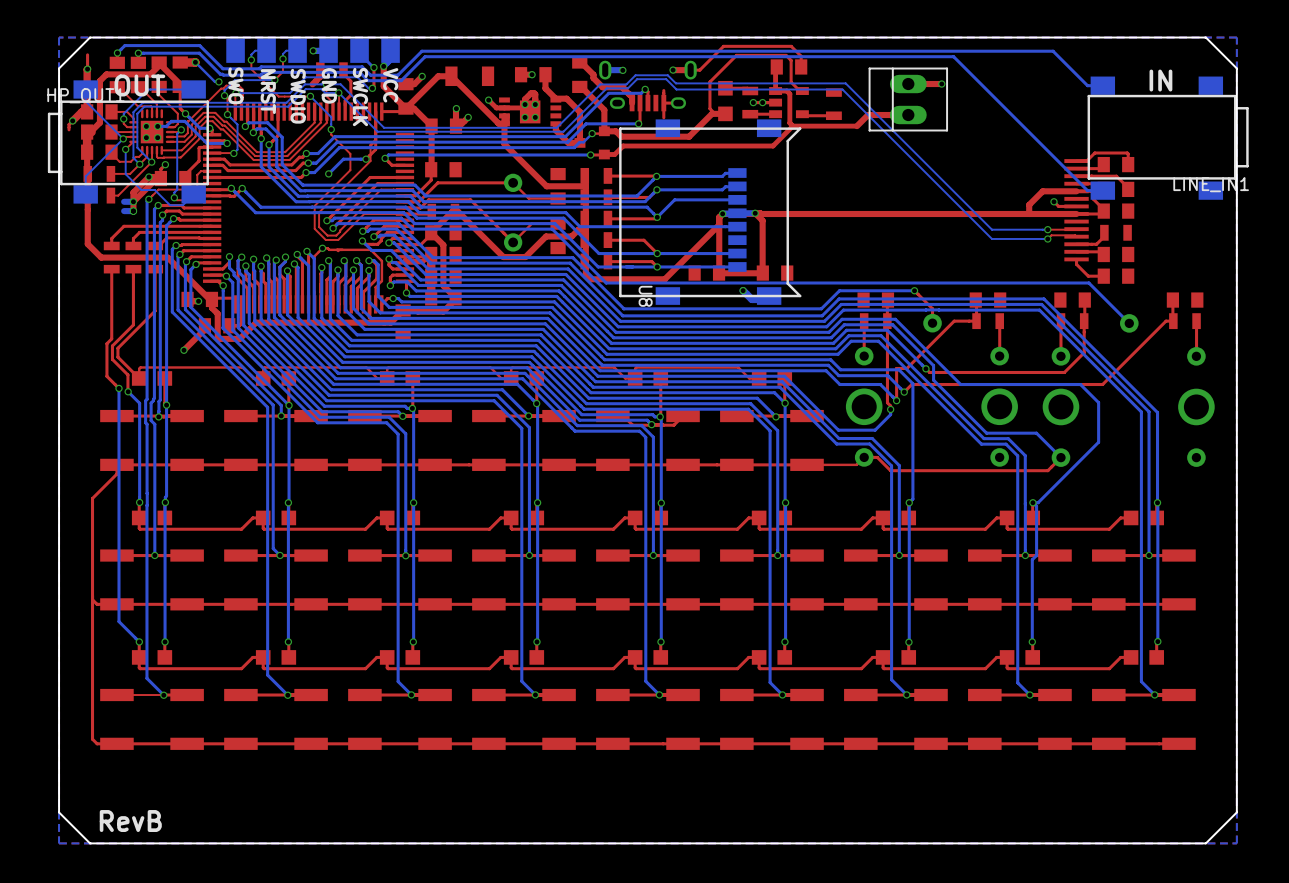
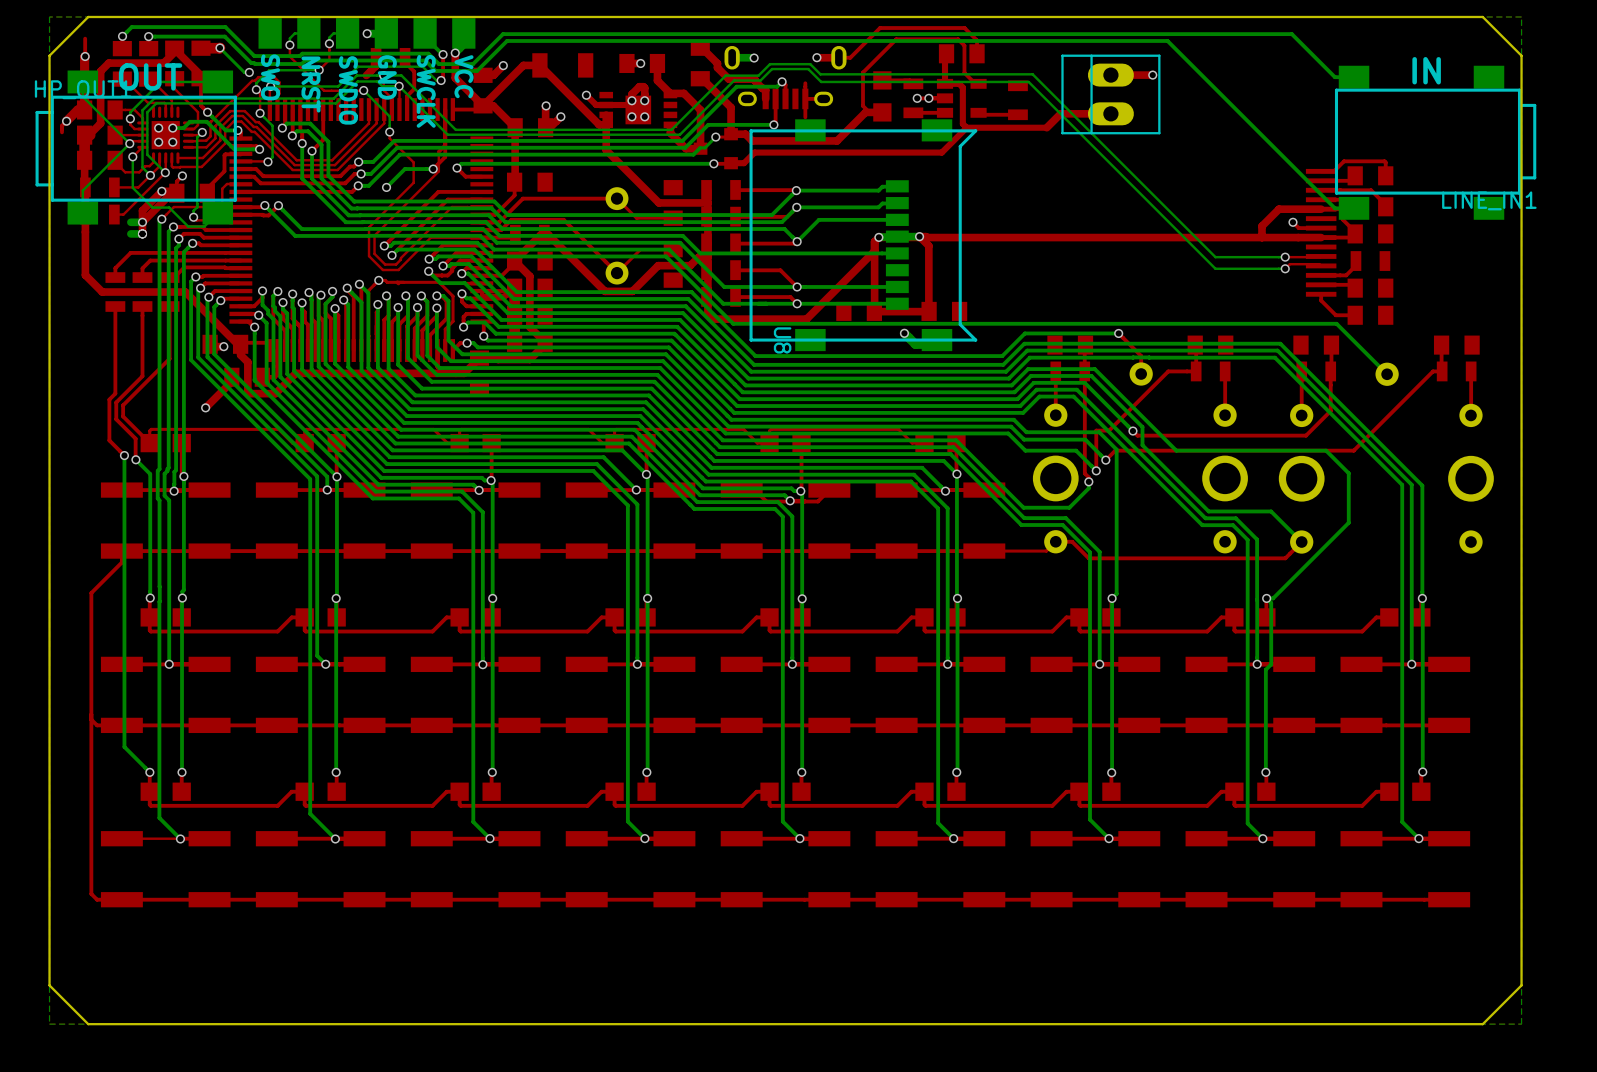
text: RevB (130, 821) -> none

